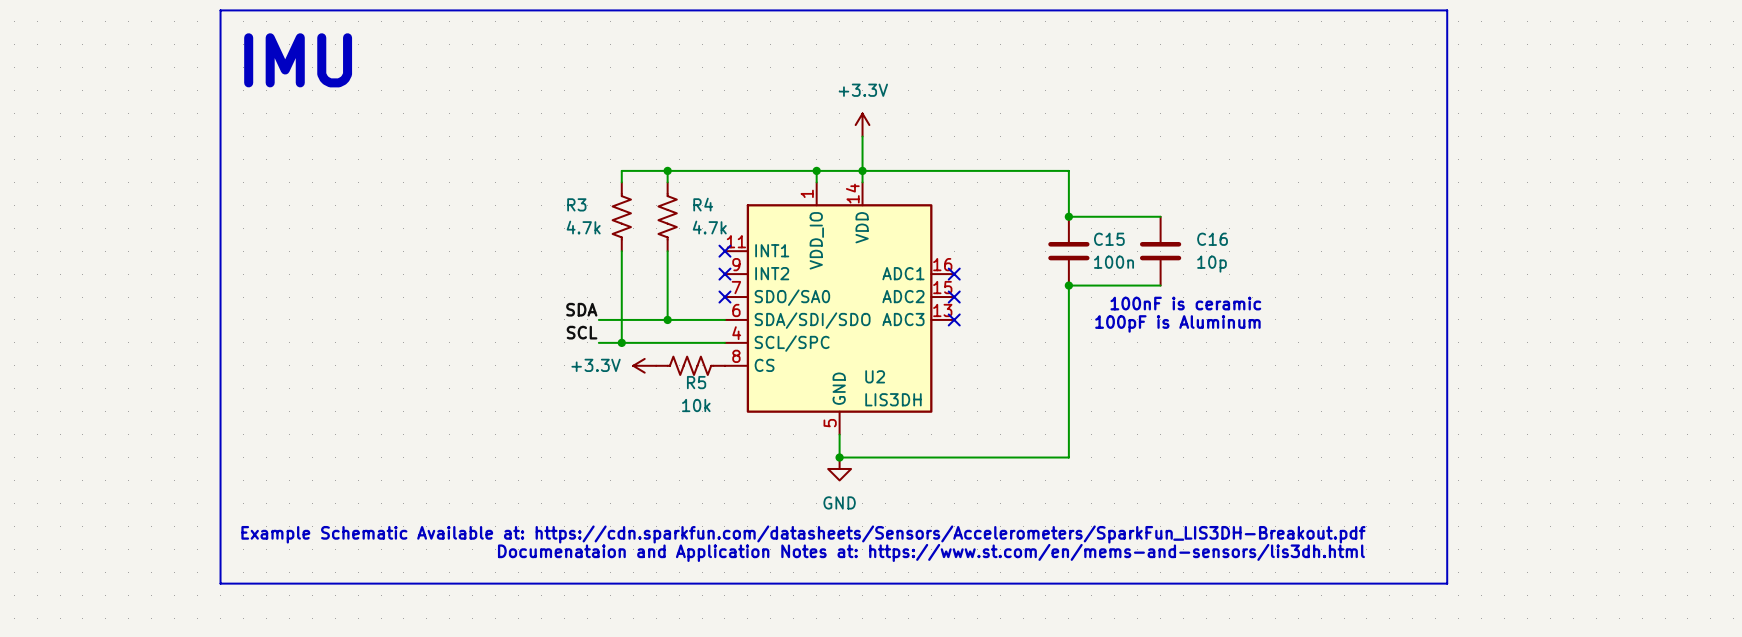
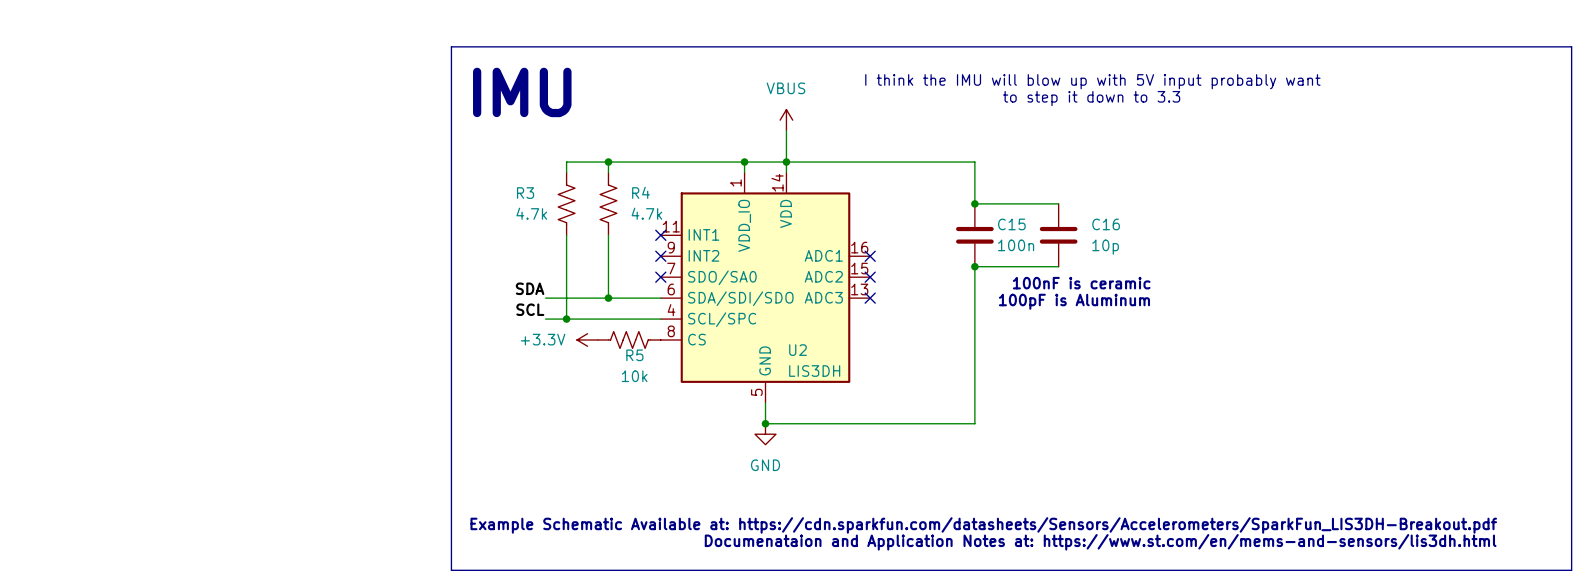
line: (220, 10) (1447, 10) (1447, 583) (220, 583) (220, 10) -> (451, 46) (1571, 46) (1571, 570) (451, 570) (451, 46)
text: IMU (298, 60) -> none
text: none -> I think the IMU will blow up with 5V input probably want (1092, 81)
text: none -> IMU (522, 92)
text: none -> to step it down to 3.3 (1091, 98)
power symbol: +3.3V (862, 125) -> VBUS (786, 120)
text: Example Schematic Available at: https://cdn.sparkfun.com/datasheets/Sensors/Accelerometers/SparkFun_LIS3DH-Breakout.pdf (803, 534) -> none
text: Documenataion and Application Notes at: https://www.st.com/en/mems-and-sensors/lis3dh.html (931, 552) -> none
text: none -> Example Schematic Available at: https://cdn.sparkfun.com/datasheets/Sensors/Accelerometers/SparkFun_LIS3DH-Breakout.pdf (983, 525)
text: none -> Documenataion and Application Notes at: https://www.st.com/en/mems-and-sensors/lis3dh.html (1100, 542)

